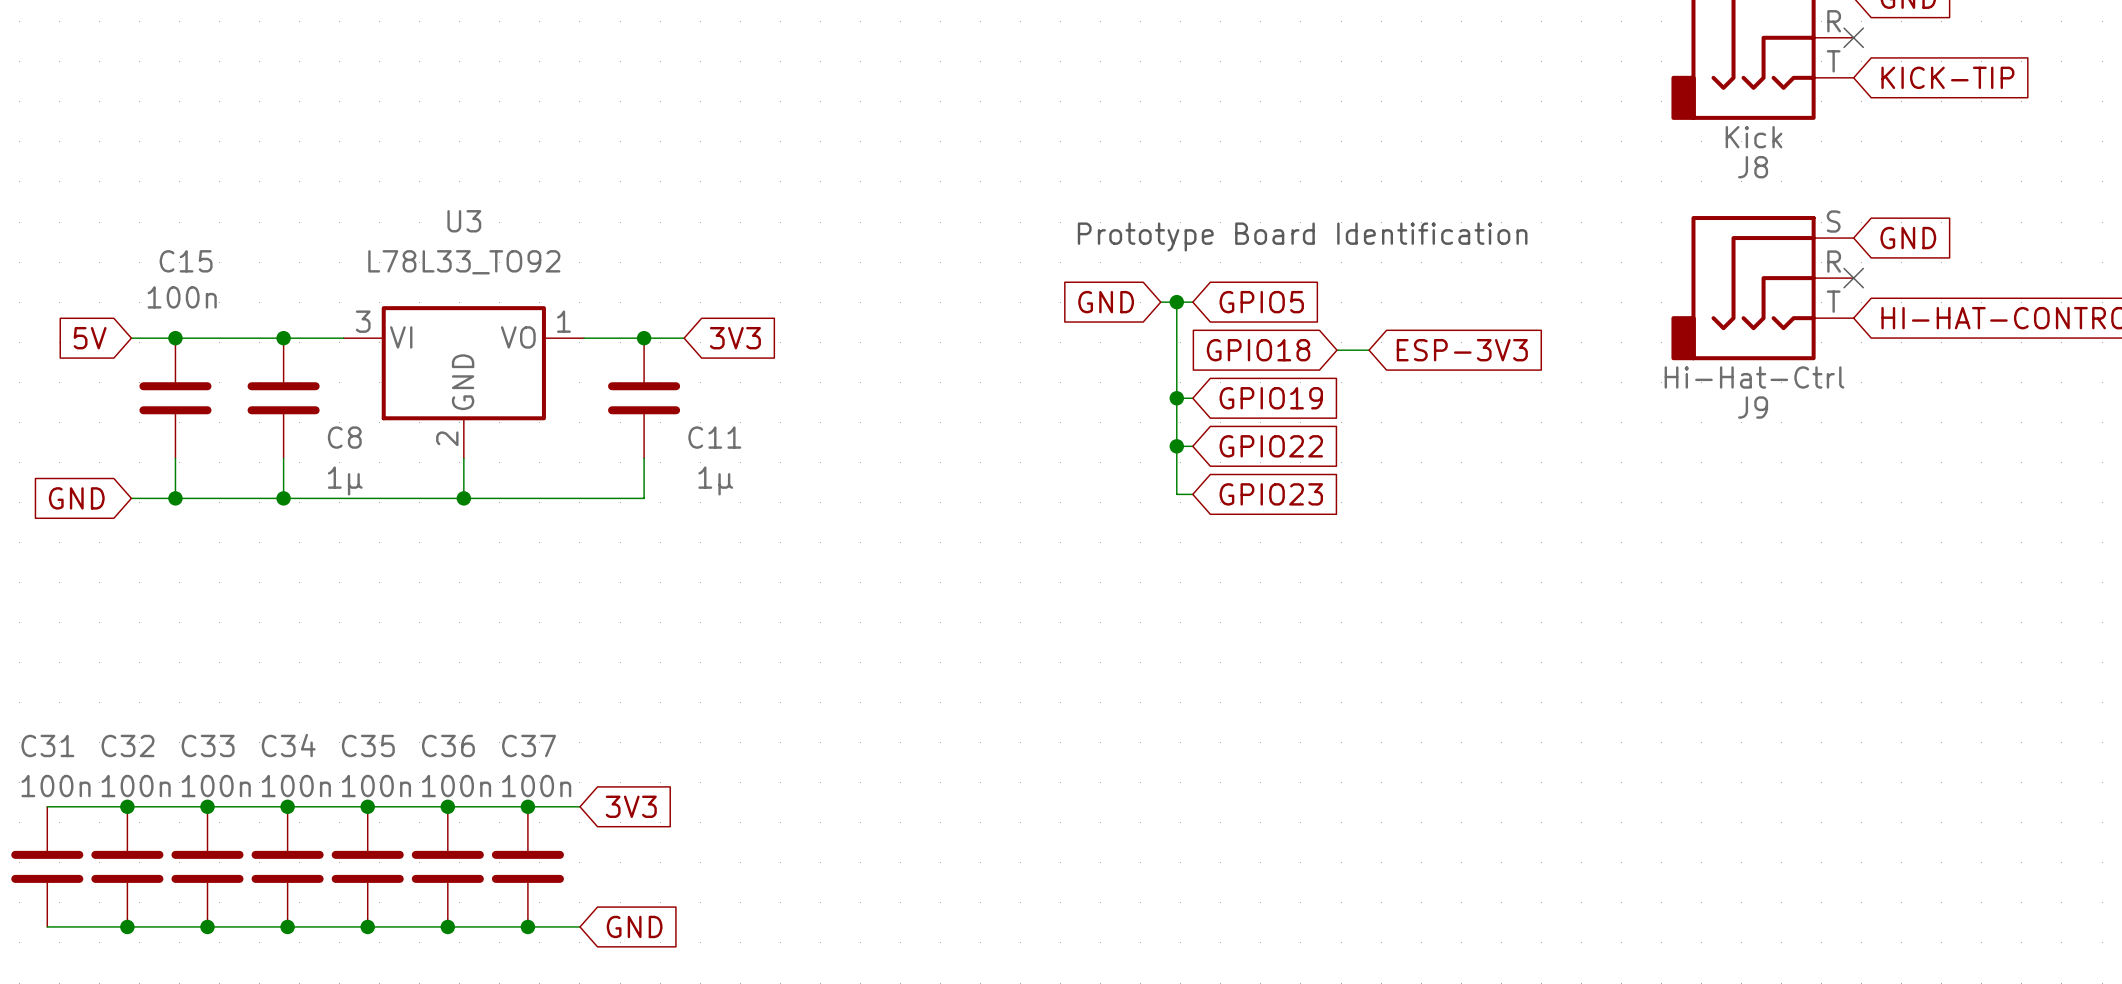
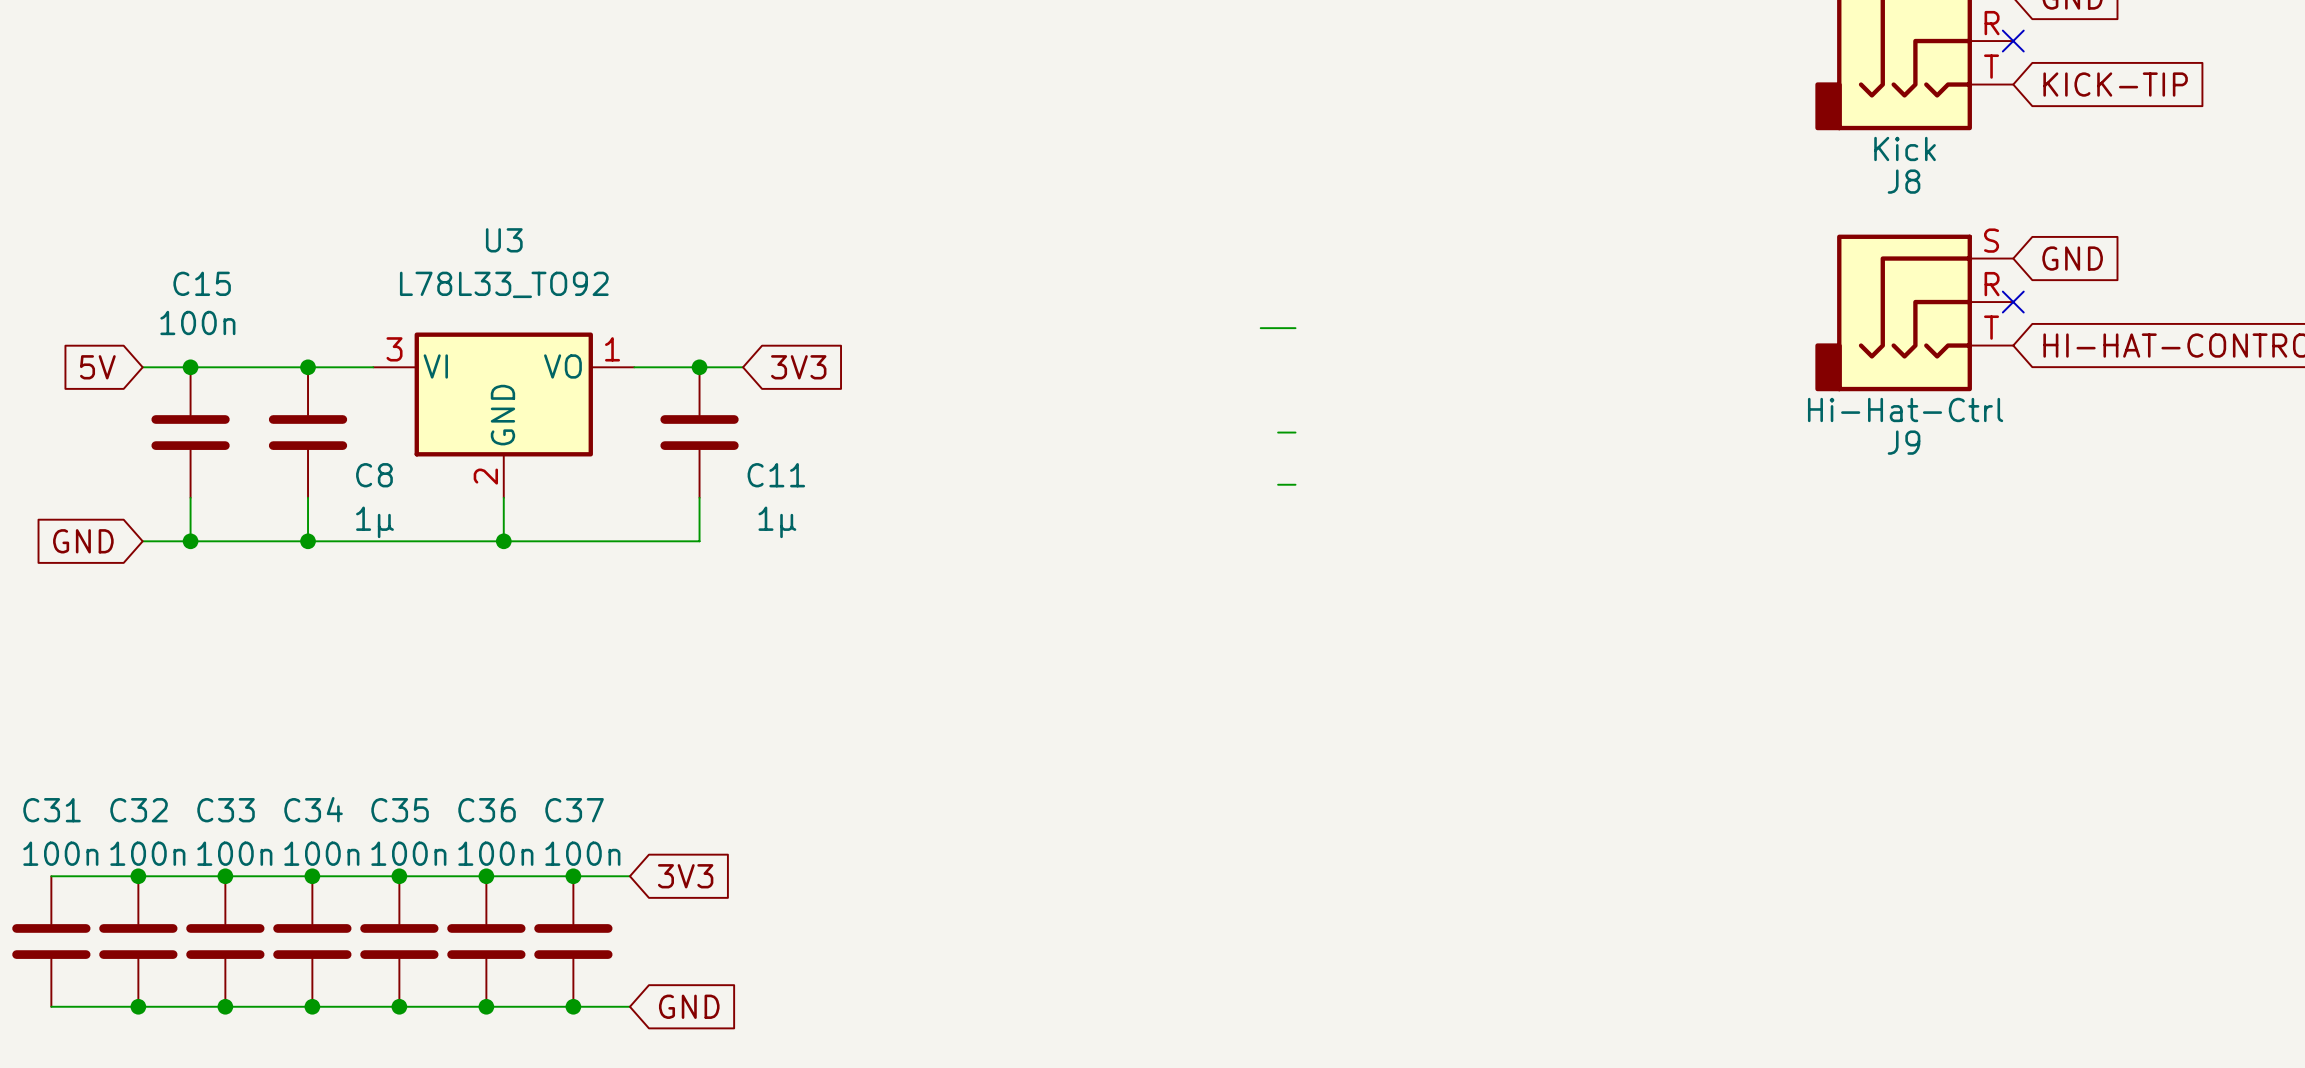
text: Prototype Board Identification (1302, 236) -> none
global label: GND (1106, 302) -> none
wire: (1176, 302) (1176, 494) (1192, 494) -> none
junction: (1176, 302) -> none
global label: GPIO5 (1261, 302) -> none
global label: GPIO18 (1258, 350) -> none
wire: (1337, 350) (1369, 350) -> none
global label: ESP-3V3 (1462, 350) -> none
junction: (1176, 398) -> none
global label: GPIO19 (1271, 398) -> none
junction: (1176, 446) -> none
global label: GPIO22 (1271, 446) -> none
global label: GPIO23 (1271, 494) -> none

